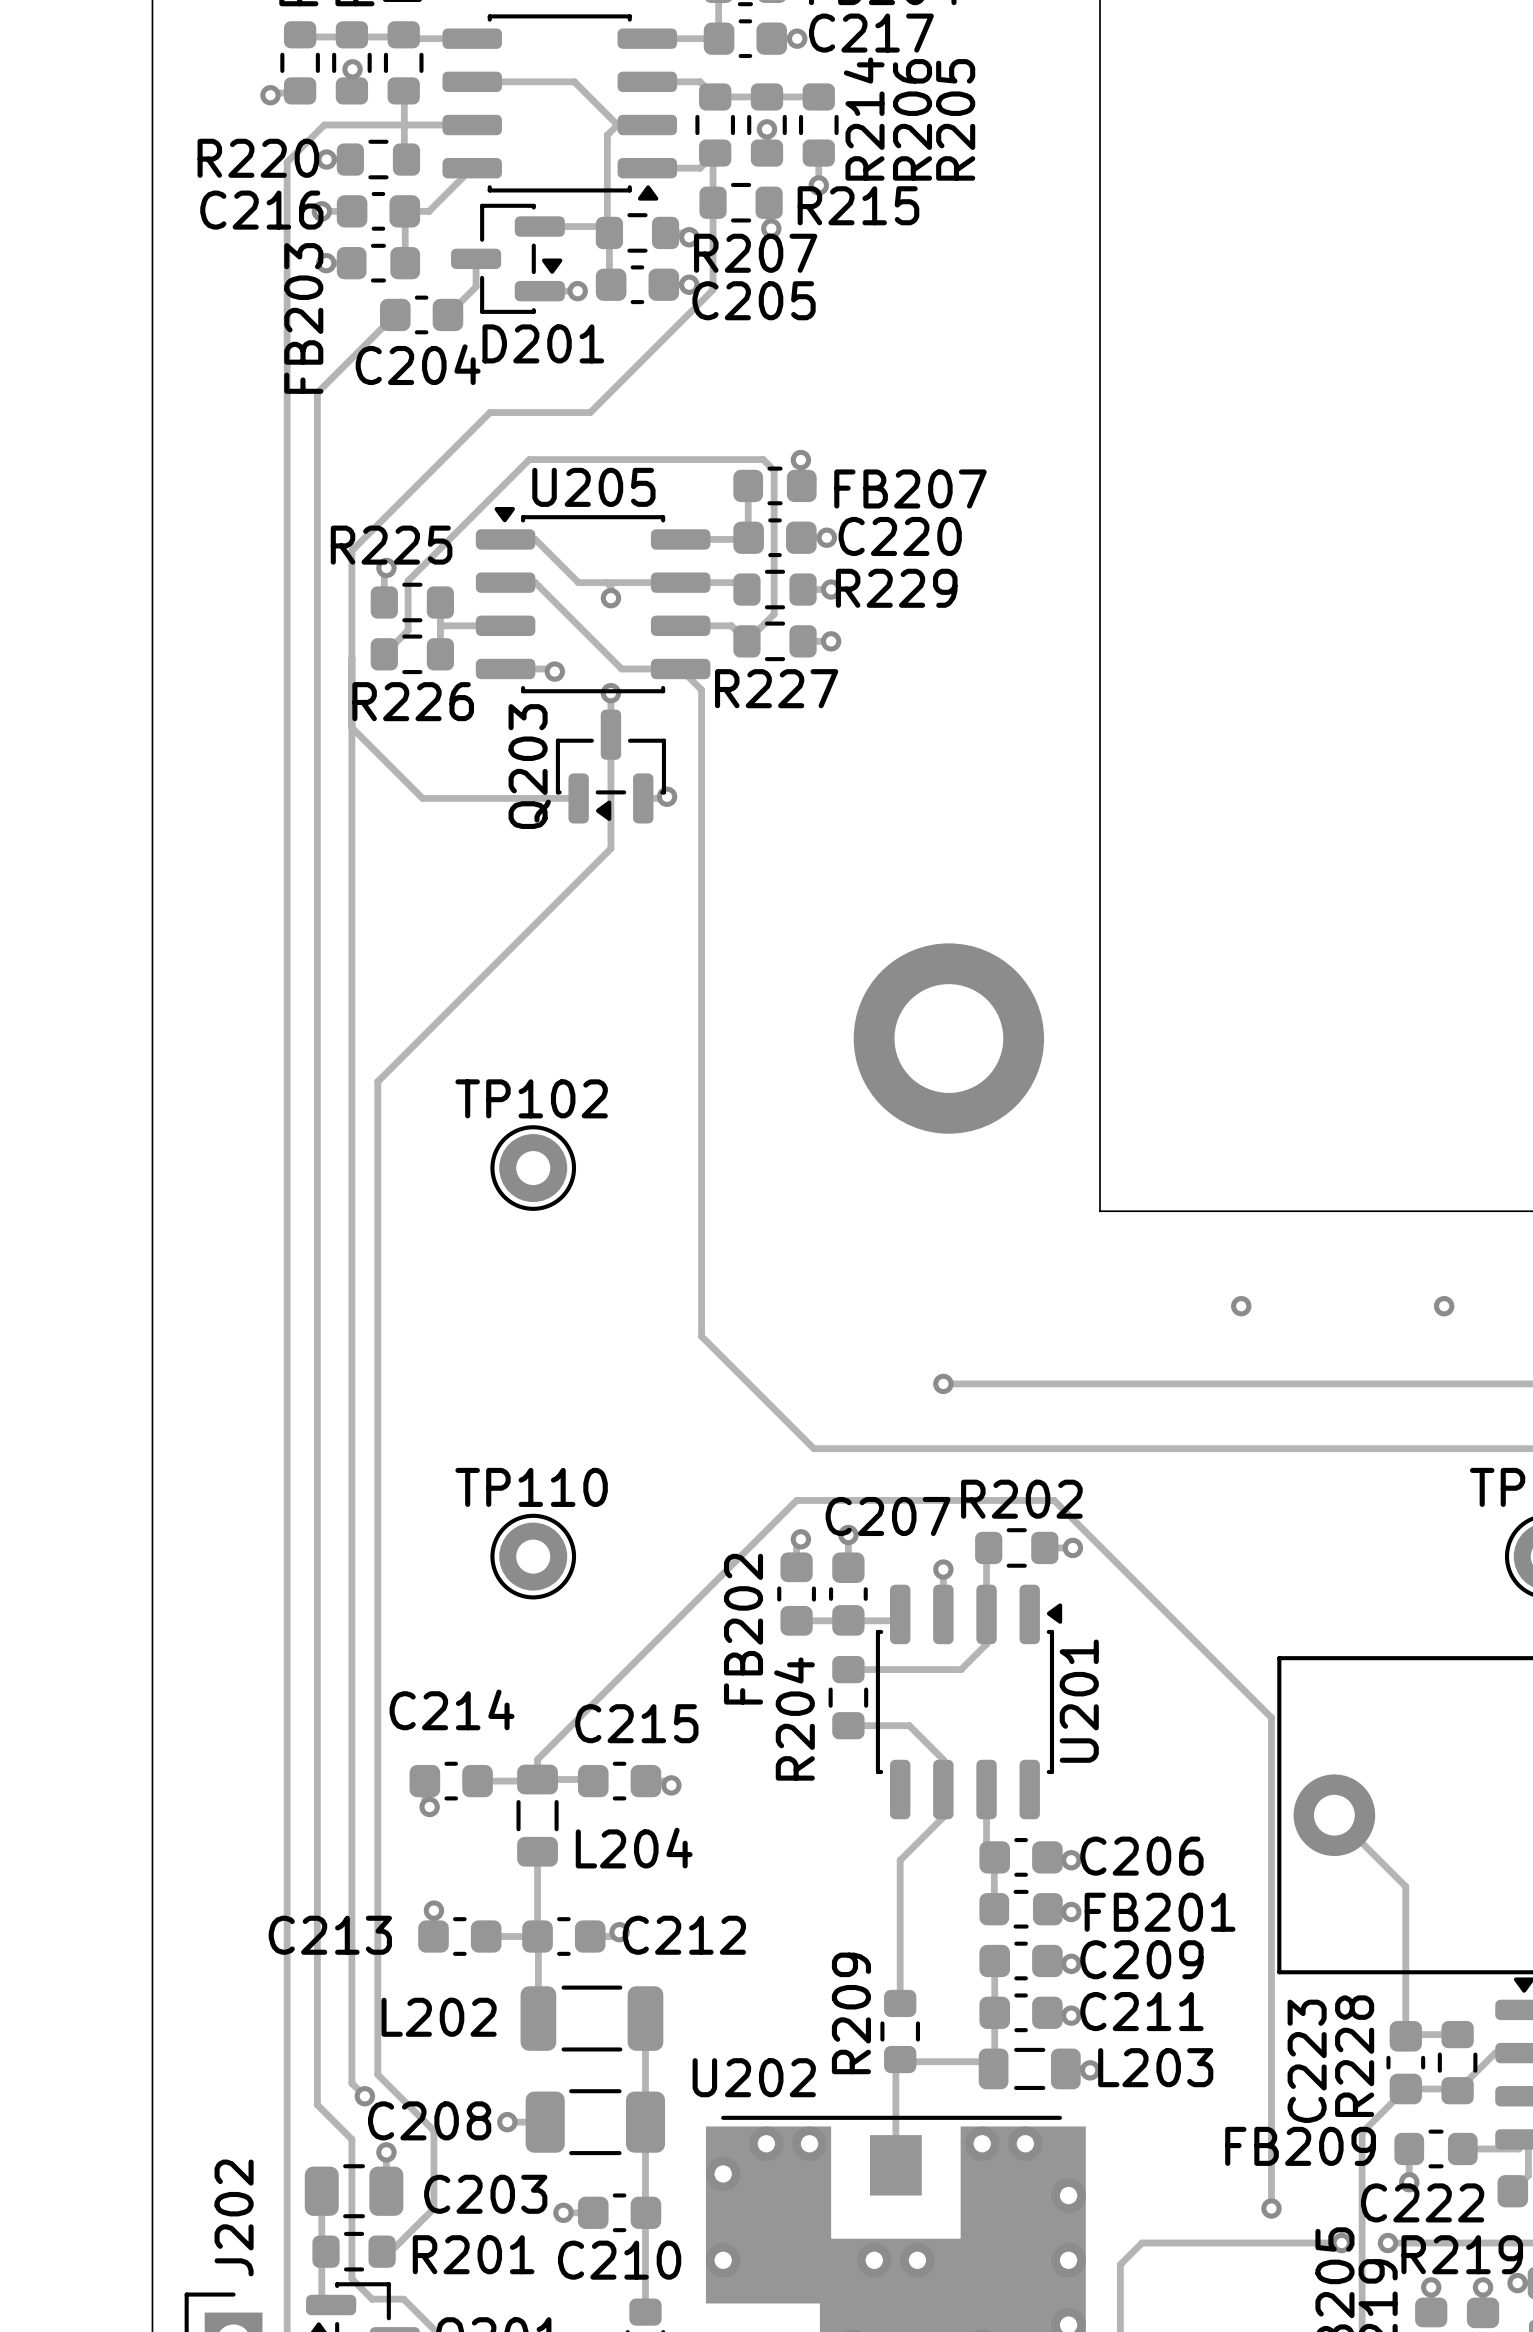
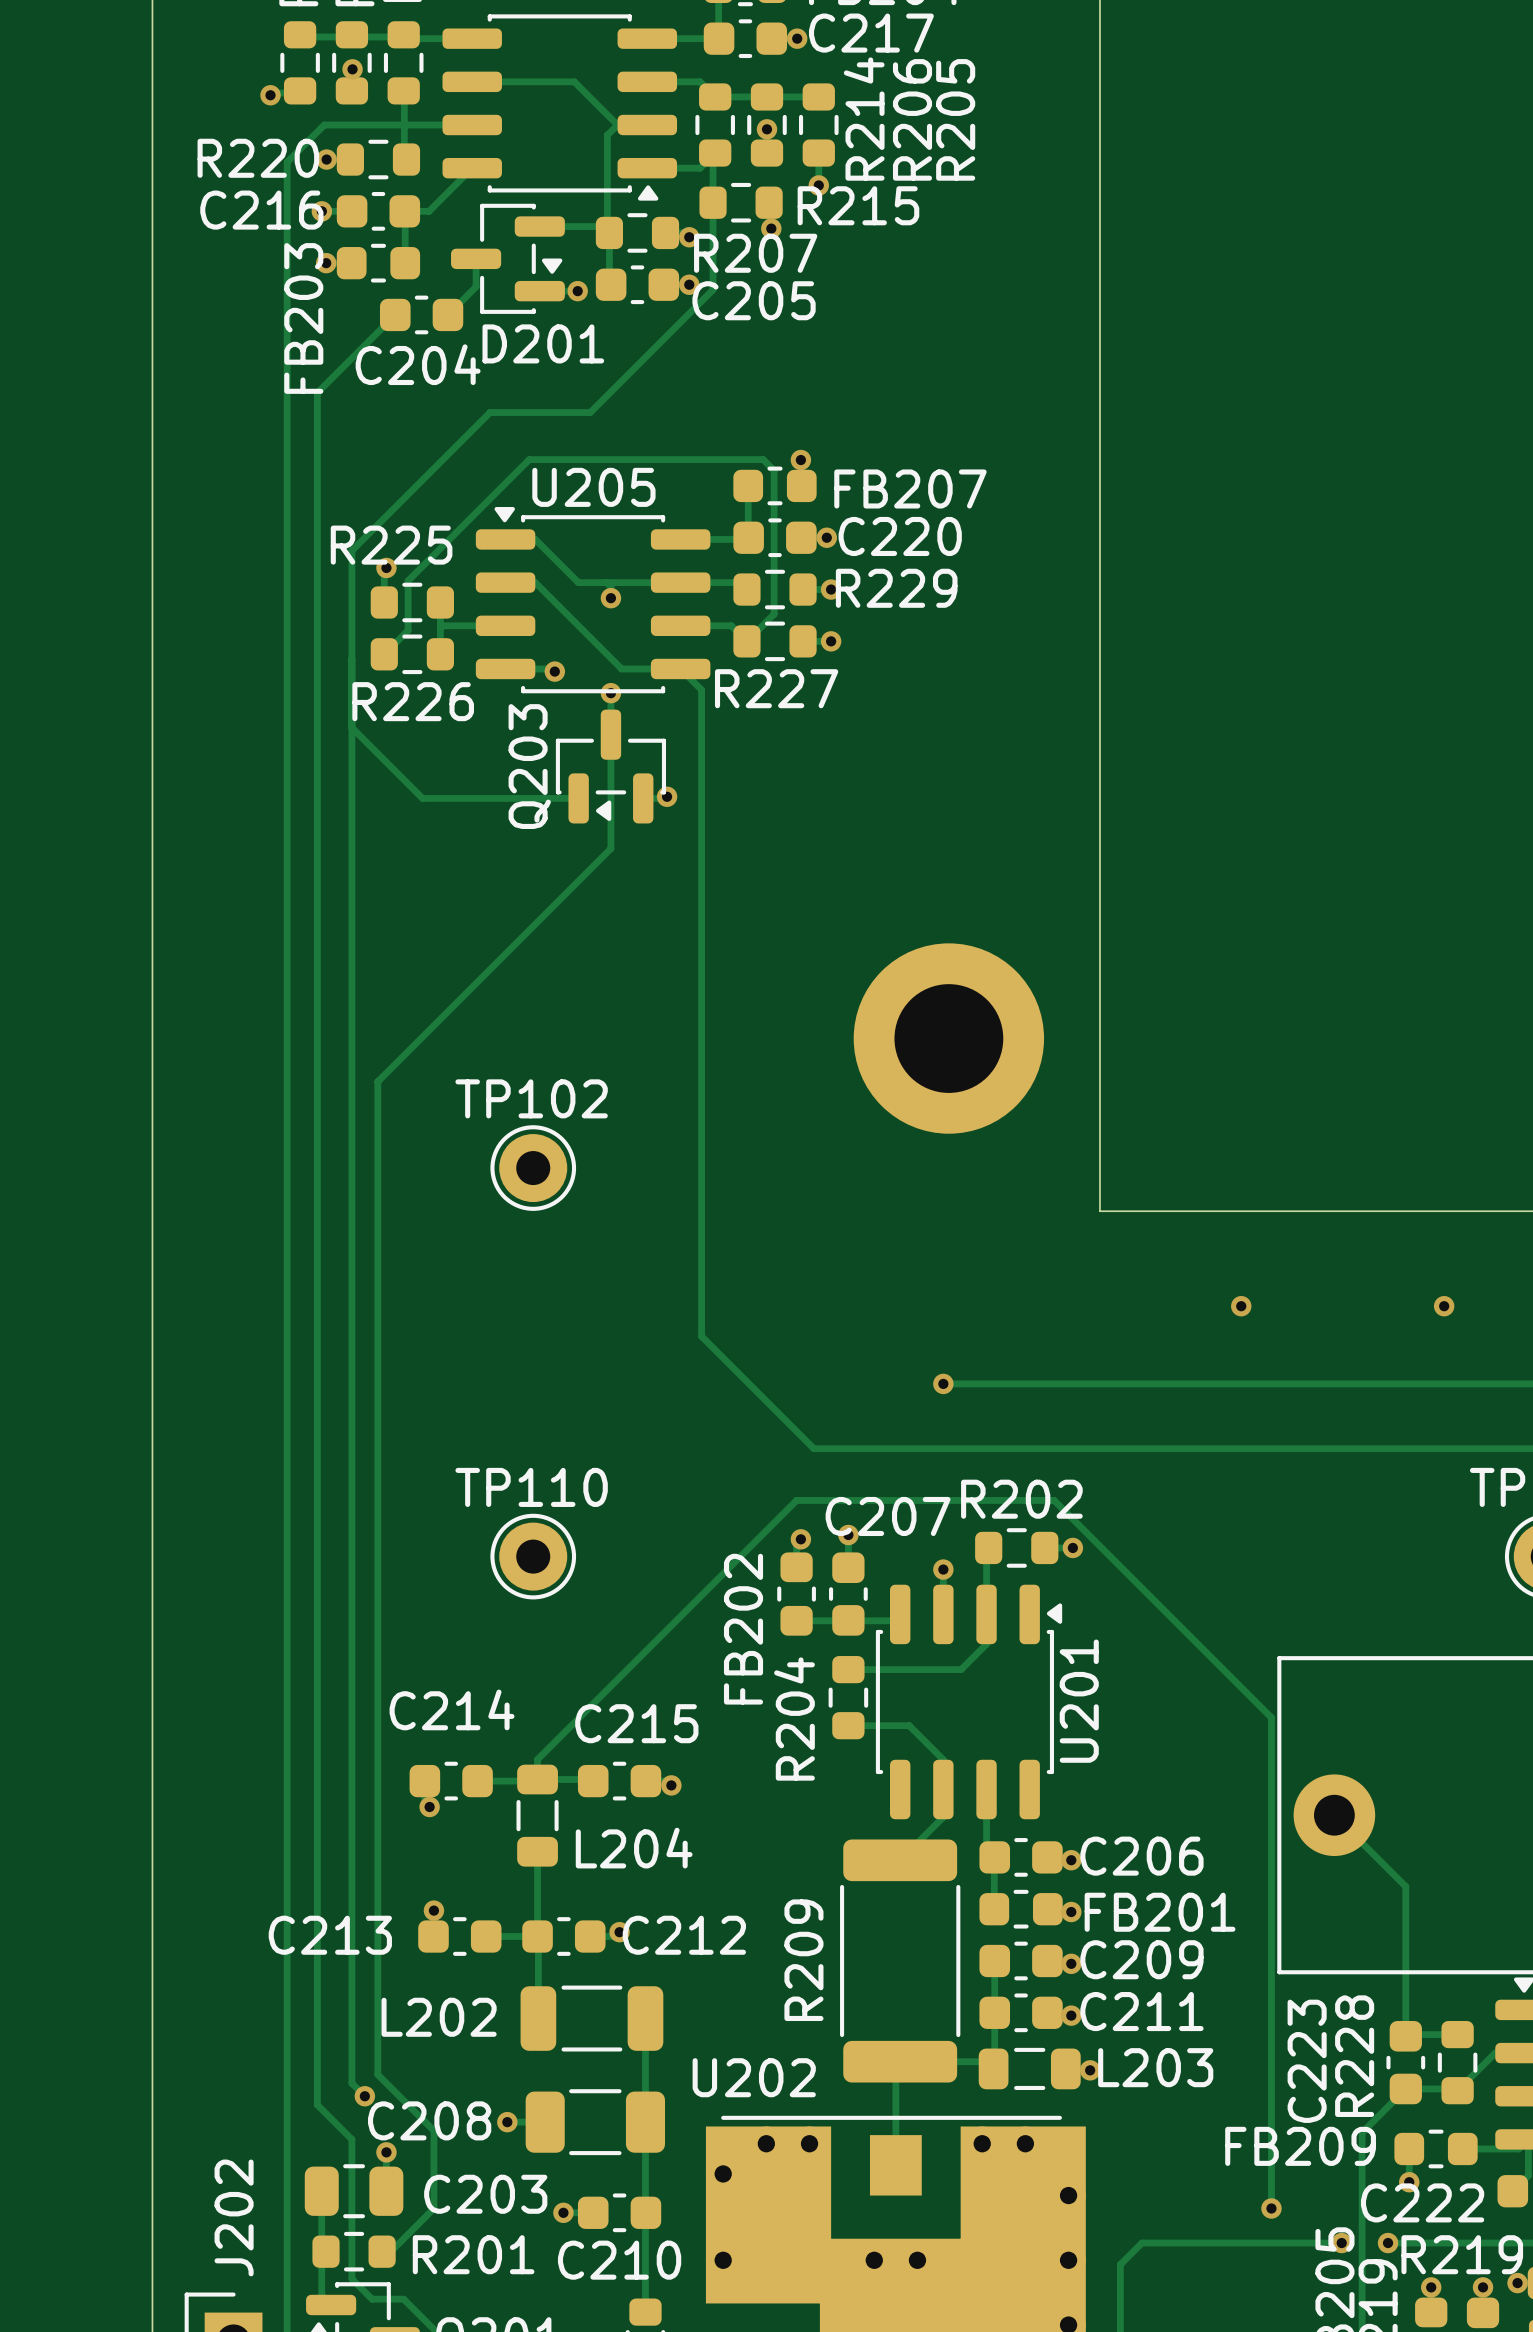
track: (900, 1860) (900, 2003) -> none
R209 footprint: [880, 1989, 920, 2074] -> [840, 1839, 961, 2083]

